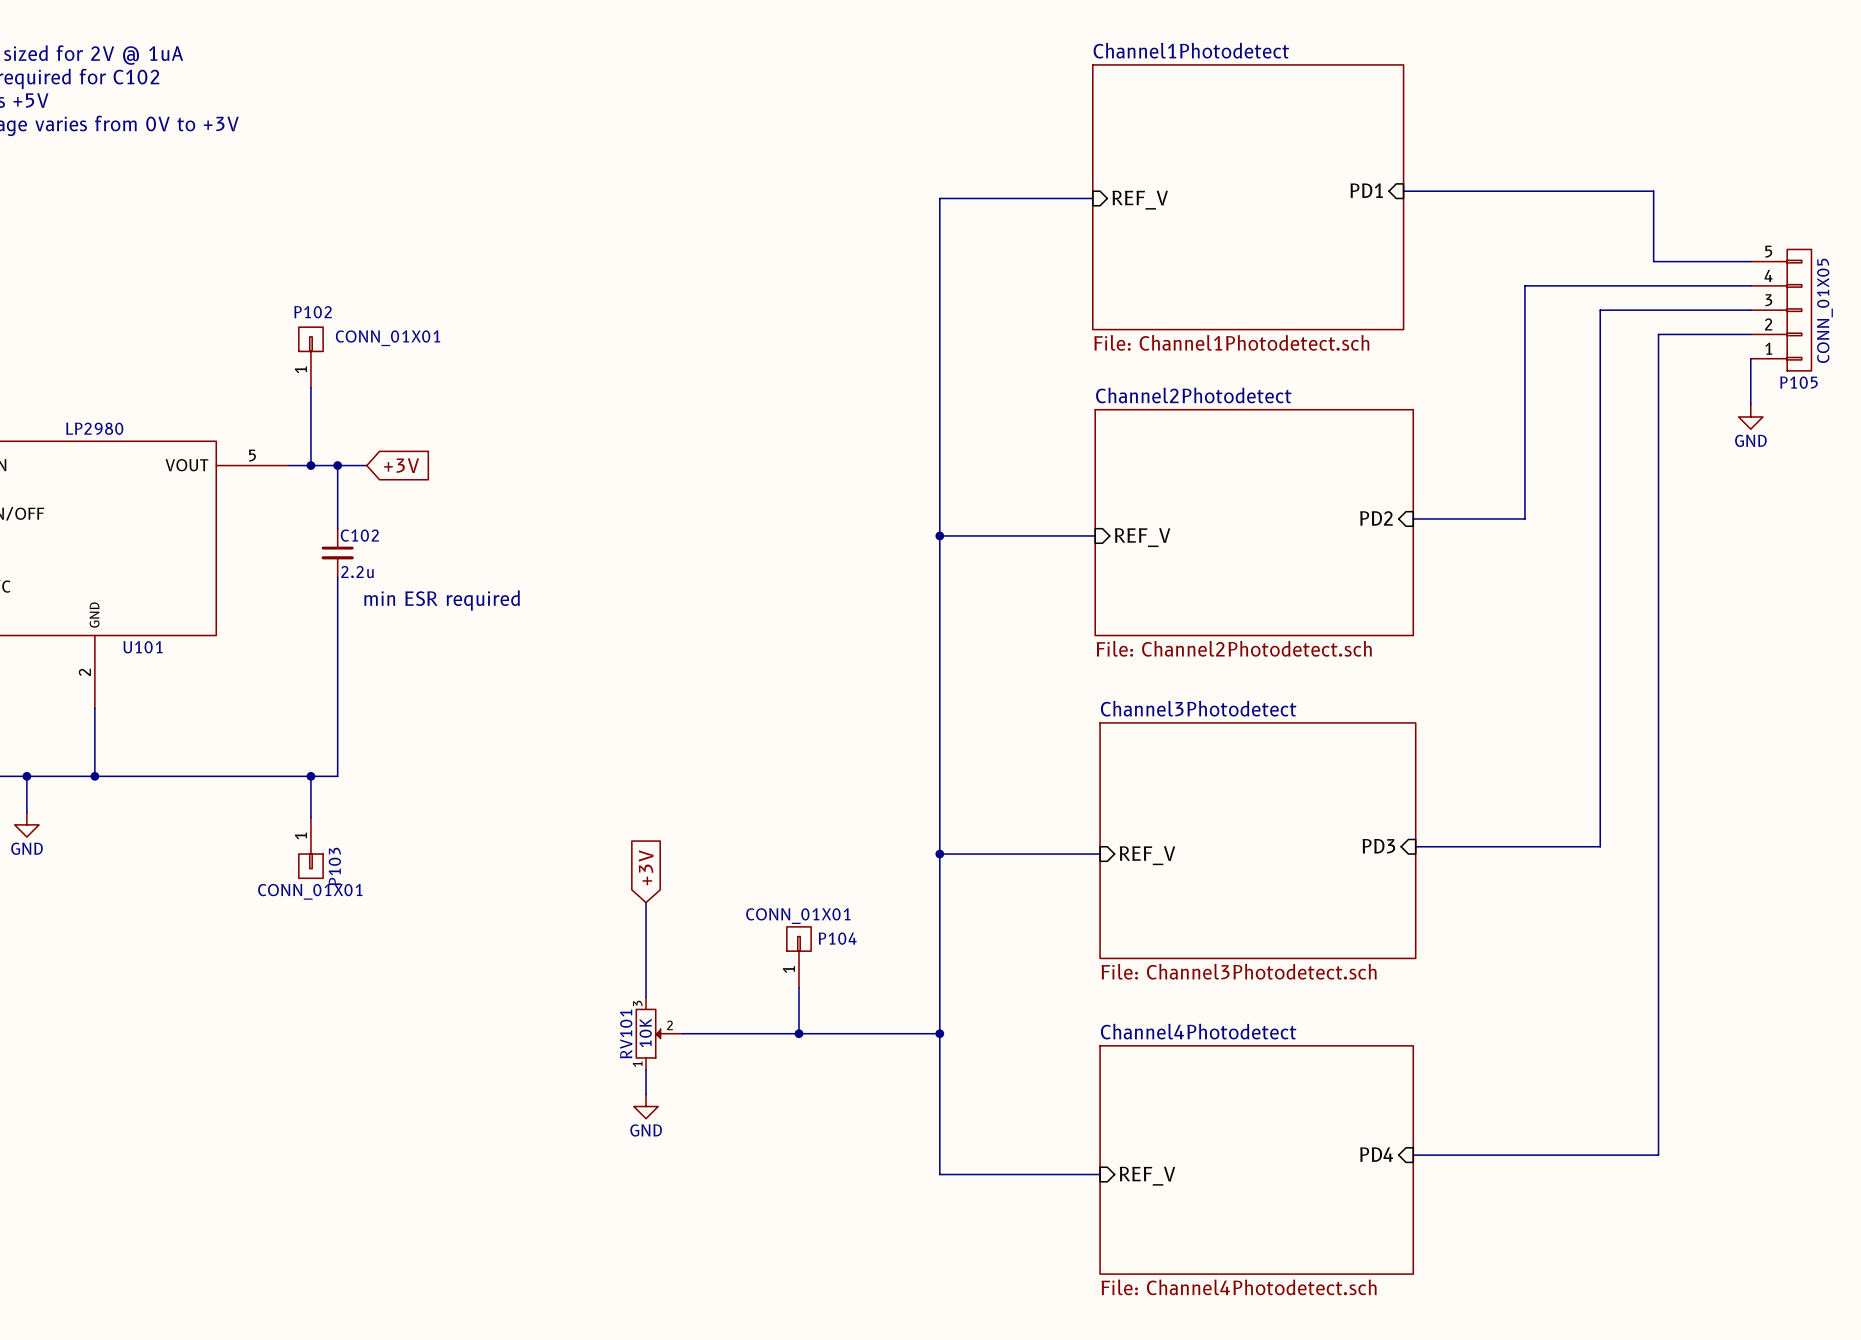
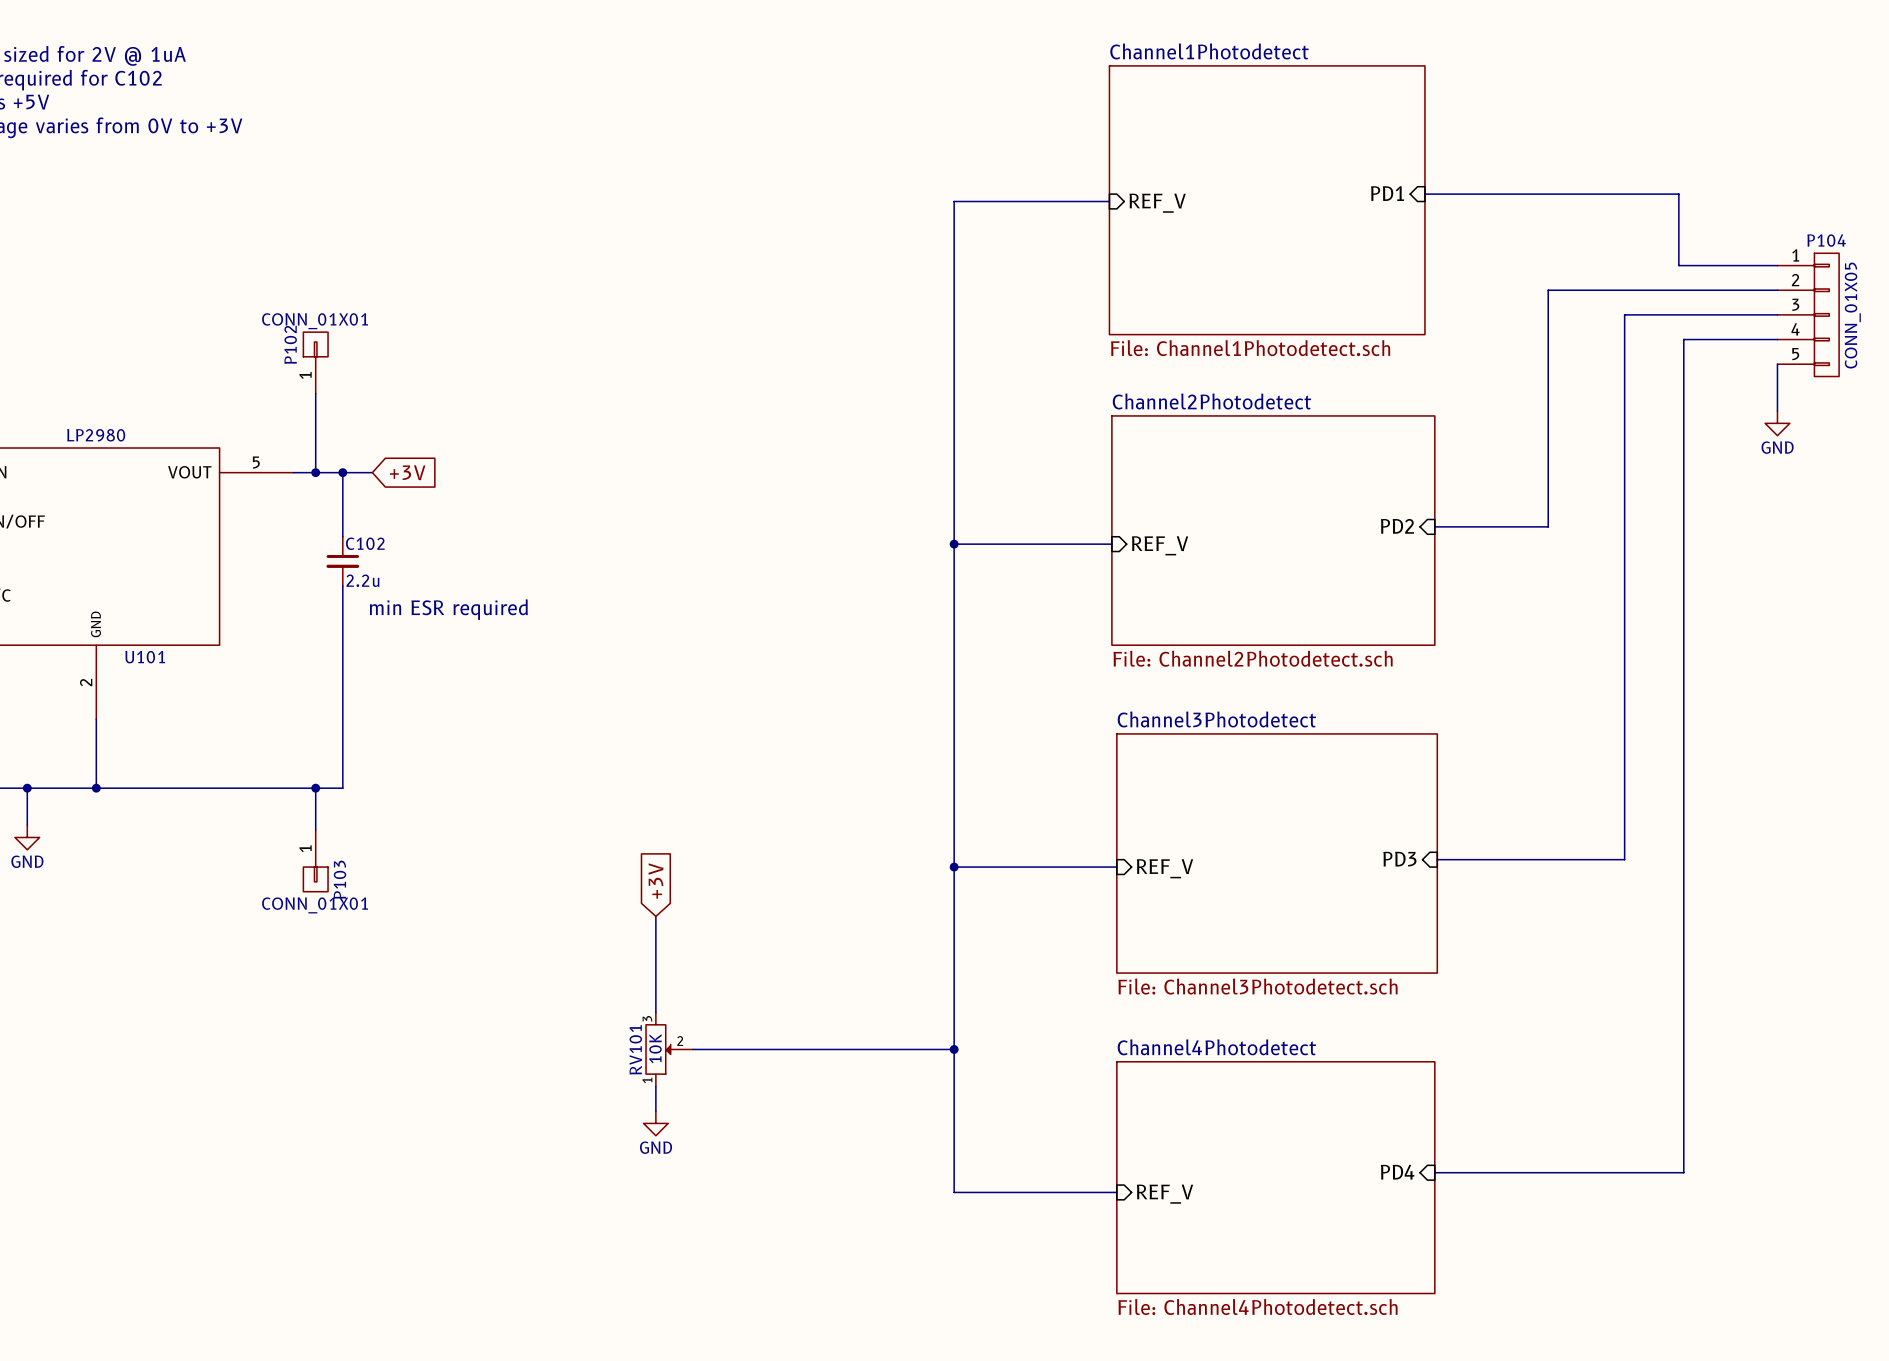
P105: CONN_01X05 (1781, 310) -> none
P102 name rotation: 0° (313, 312) -> 90° counterclockwise (290, 344)
P102 value position: CONN_01X01 (388, 338) -> CONN_01X01 (315, 321)
P104 value: CONN_01X01 (798, 916) -> CONN_01X05 (1852, 315)
P104 symbol: [786, 926, 812, 988] -> [1777, 253, 1840, 377]
P104 name position: P104 (837, 938) -> P104 (1826, 240)
wire: (798, 987) (798, 1033) -> none
junction: (798, 1033) -> none

